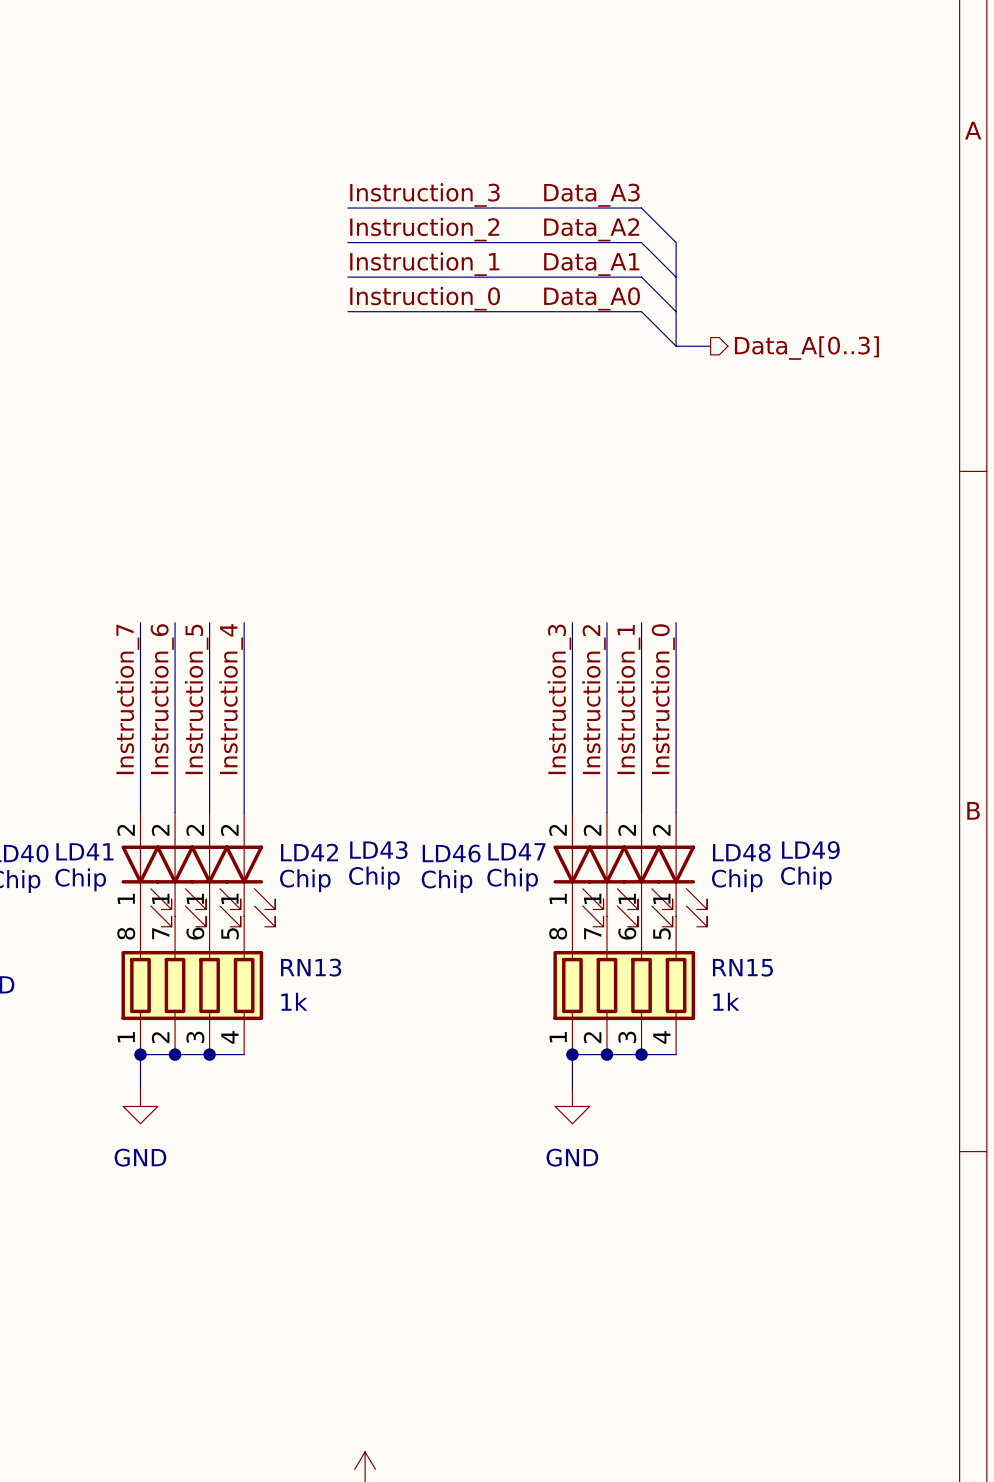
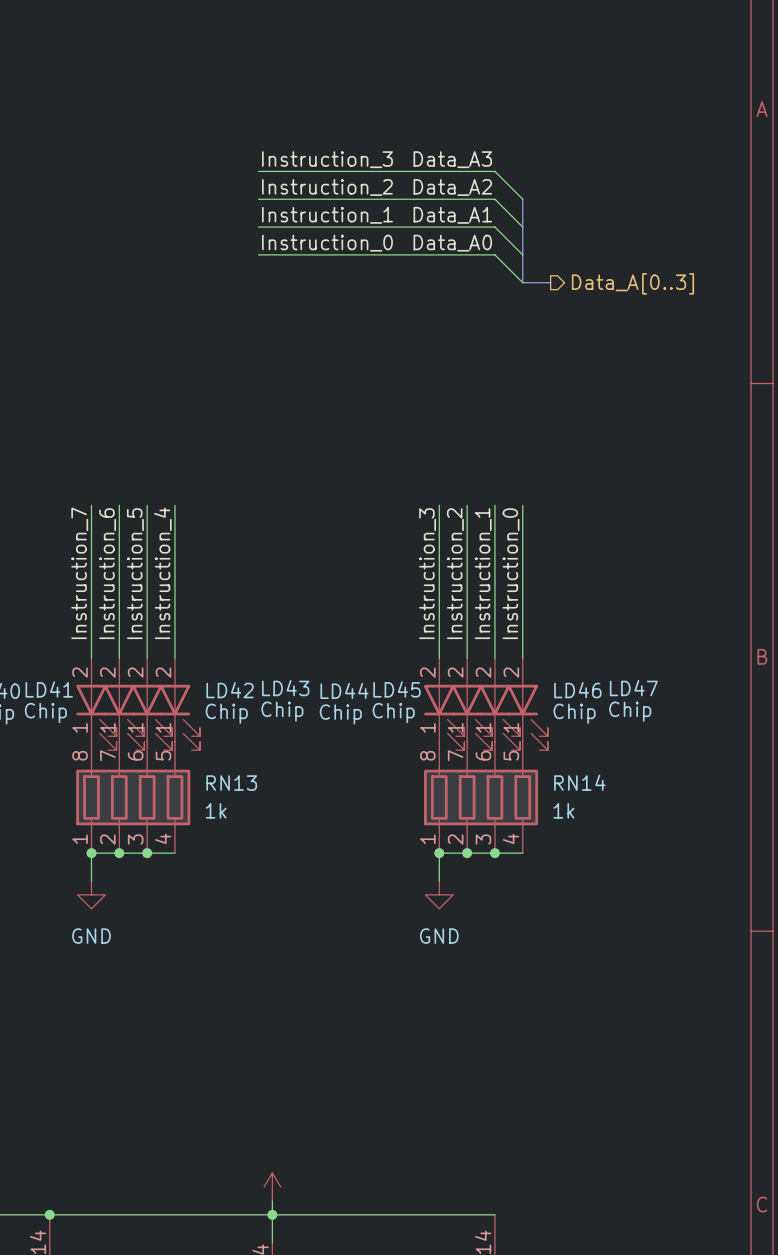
LD49 name: LD49 (810, 850) -> LD47 (633, 688)
LD47 name: LD47 (516, 851) -> LD45 (397, 689)
LD48 name: LD48 (741, 852) -> LD46 (577, 690)
LD46 name: LD46 (451, 853) -> LD44 (344, 690)
RN15 name: RN15 (742, 967) -> RN14 (579, 782)

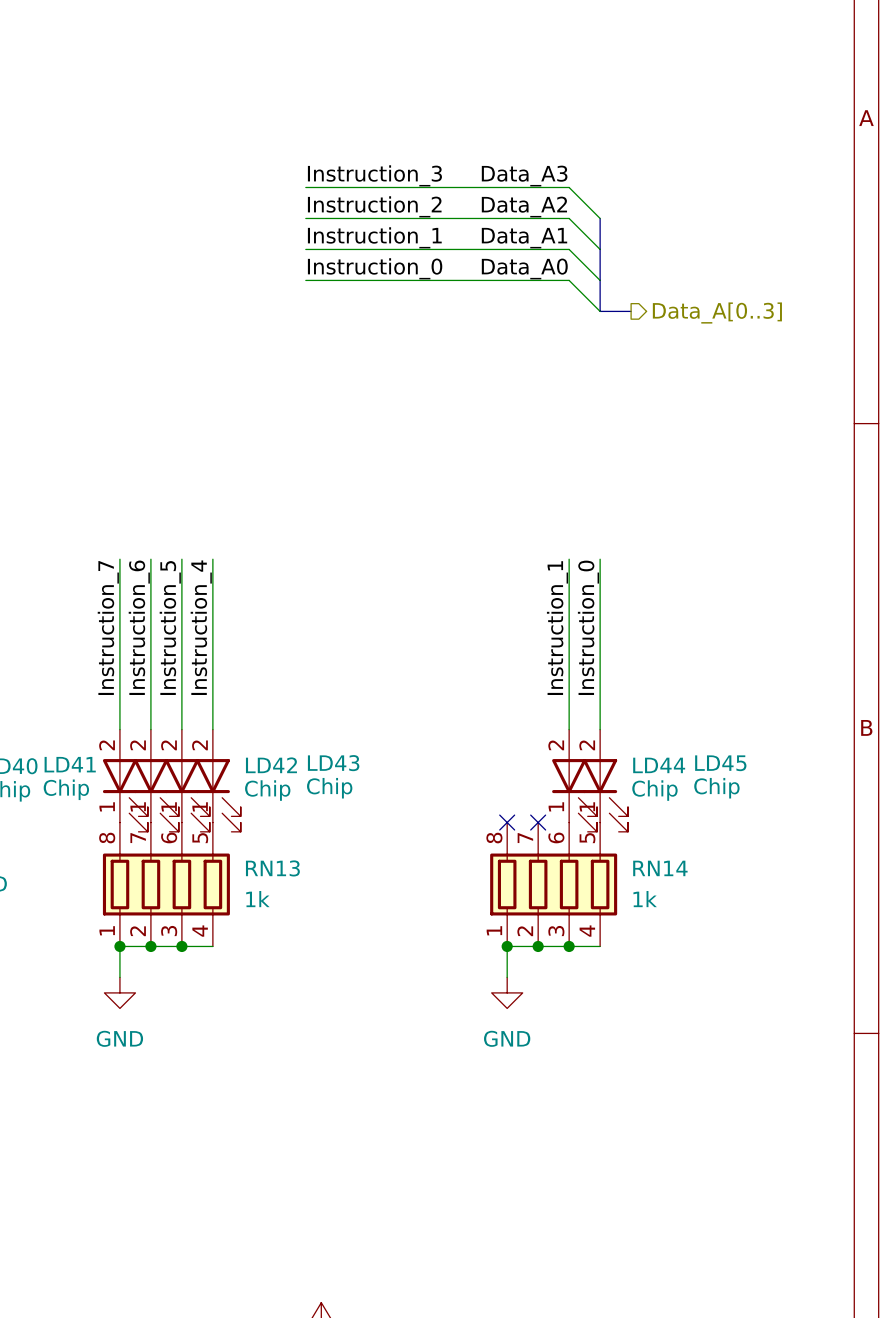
wire: (439, 505) (439, 658) -> none
wire: (467, 505) (467, 658) -> none
label: Instruction_3 (427, 573) -> none
label: Instruction_2 (455, 573) -> none
LD47 name: LD47 (633, 688) -> LD45 (720, 763)
LD46 name: LD46 (577, 690) -> LD44 (659, 765)
LD44: Chip (444, 704) -> none
LD45: Chip (472, 704) -> none
no-connect mark: none -> (507, 822)
no-connect mark: none -> (538, 822)

